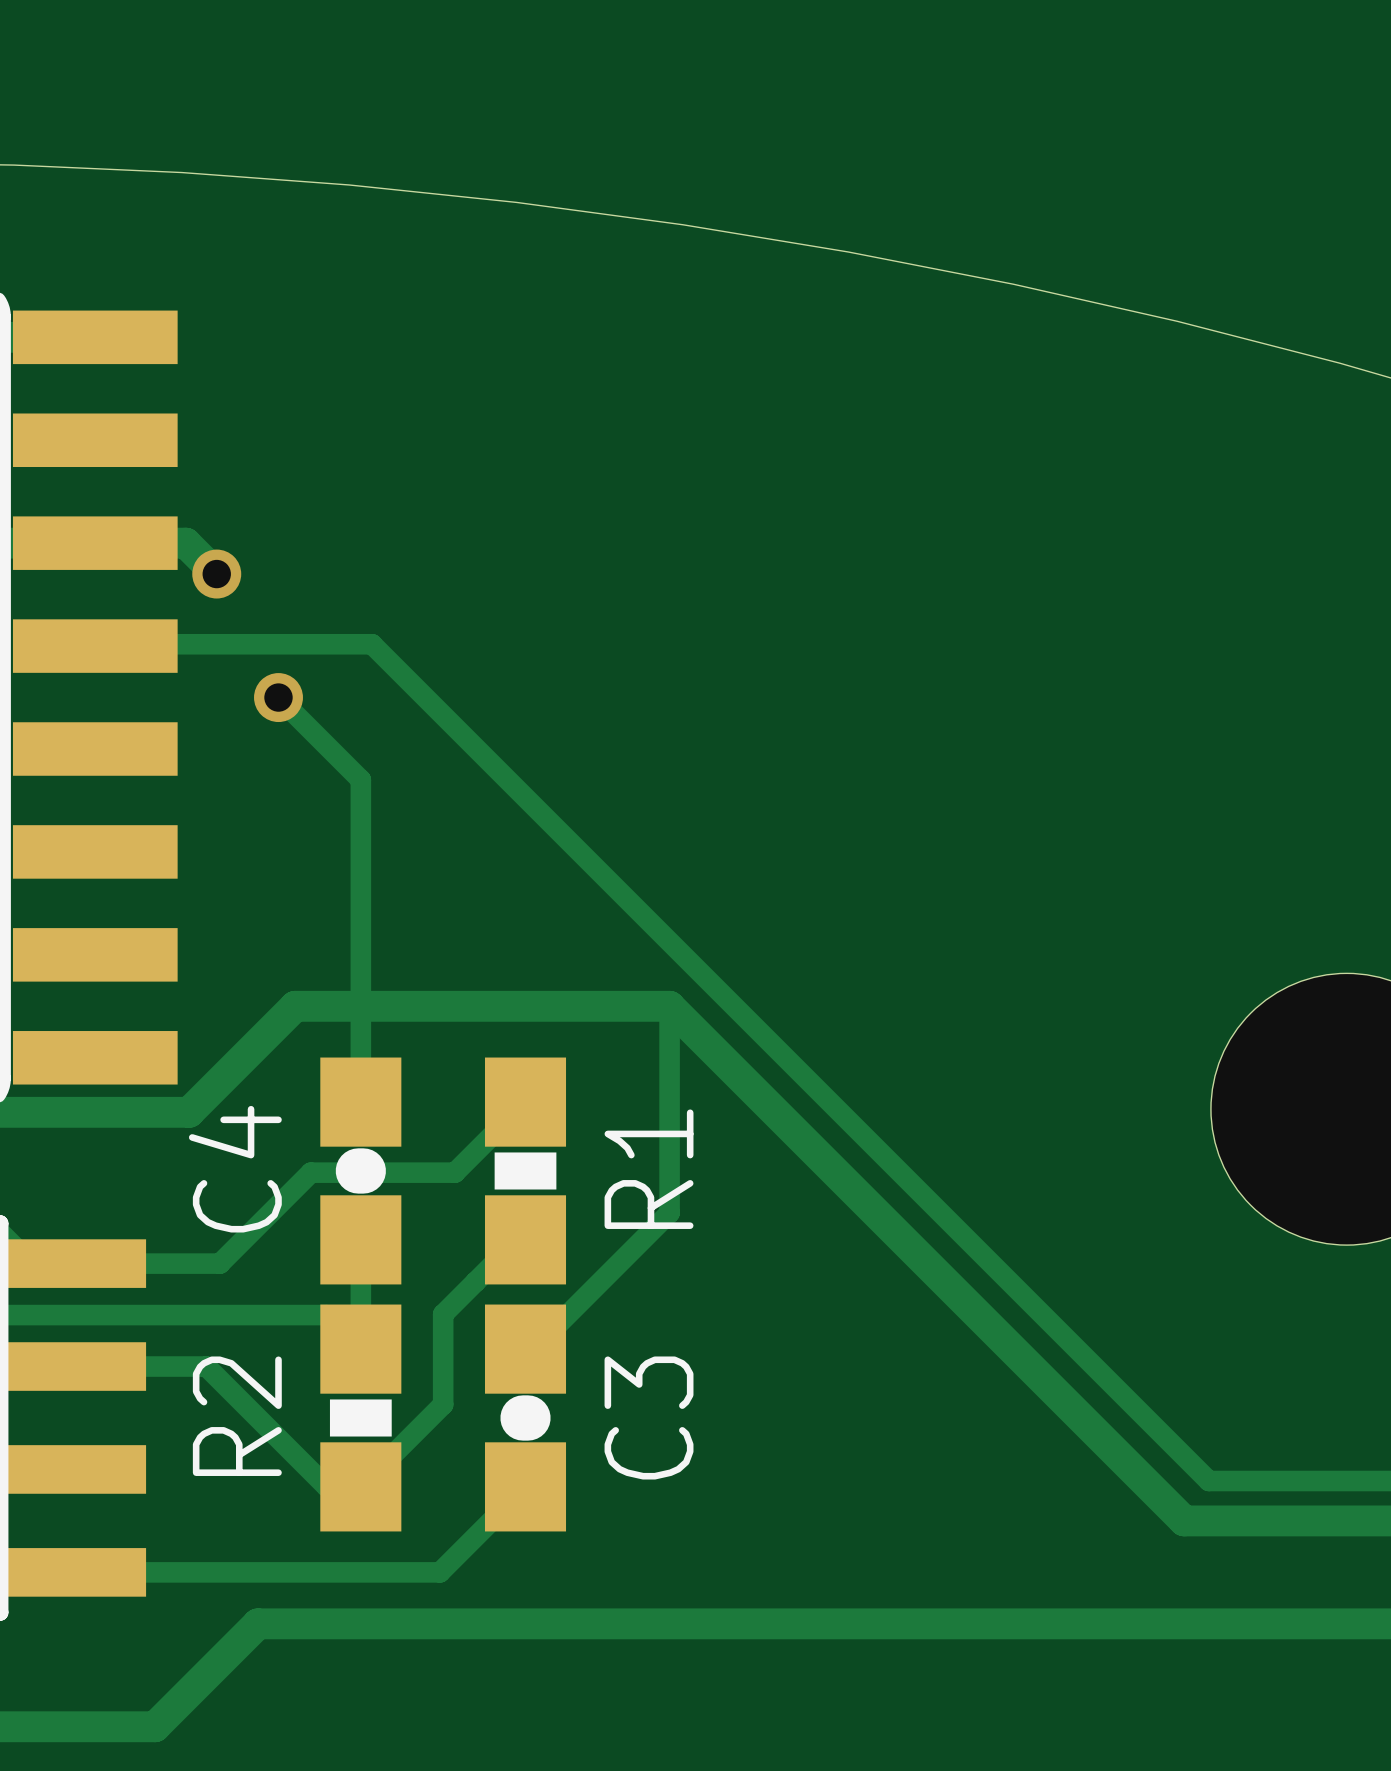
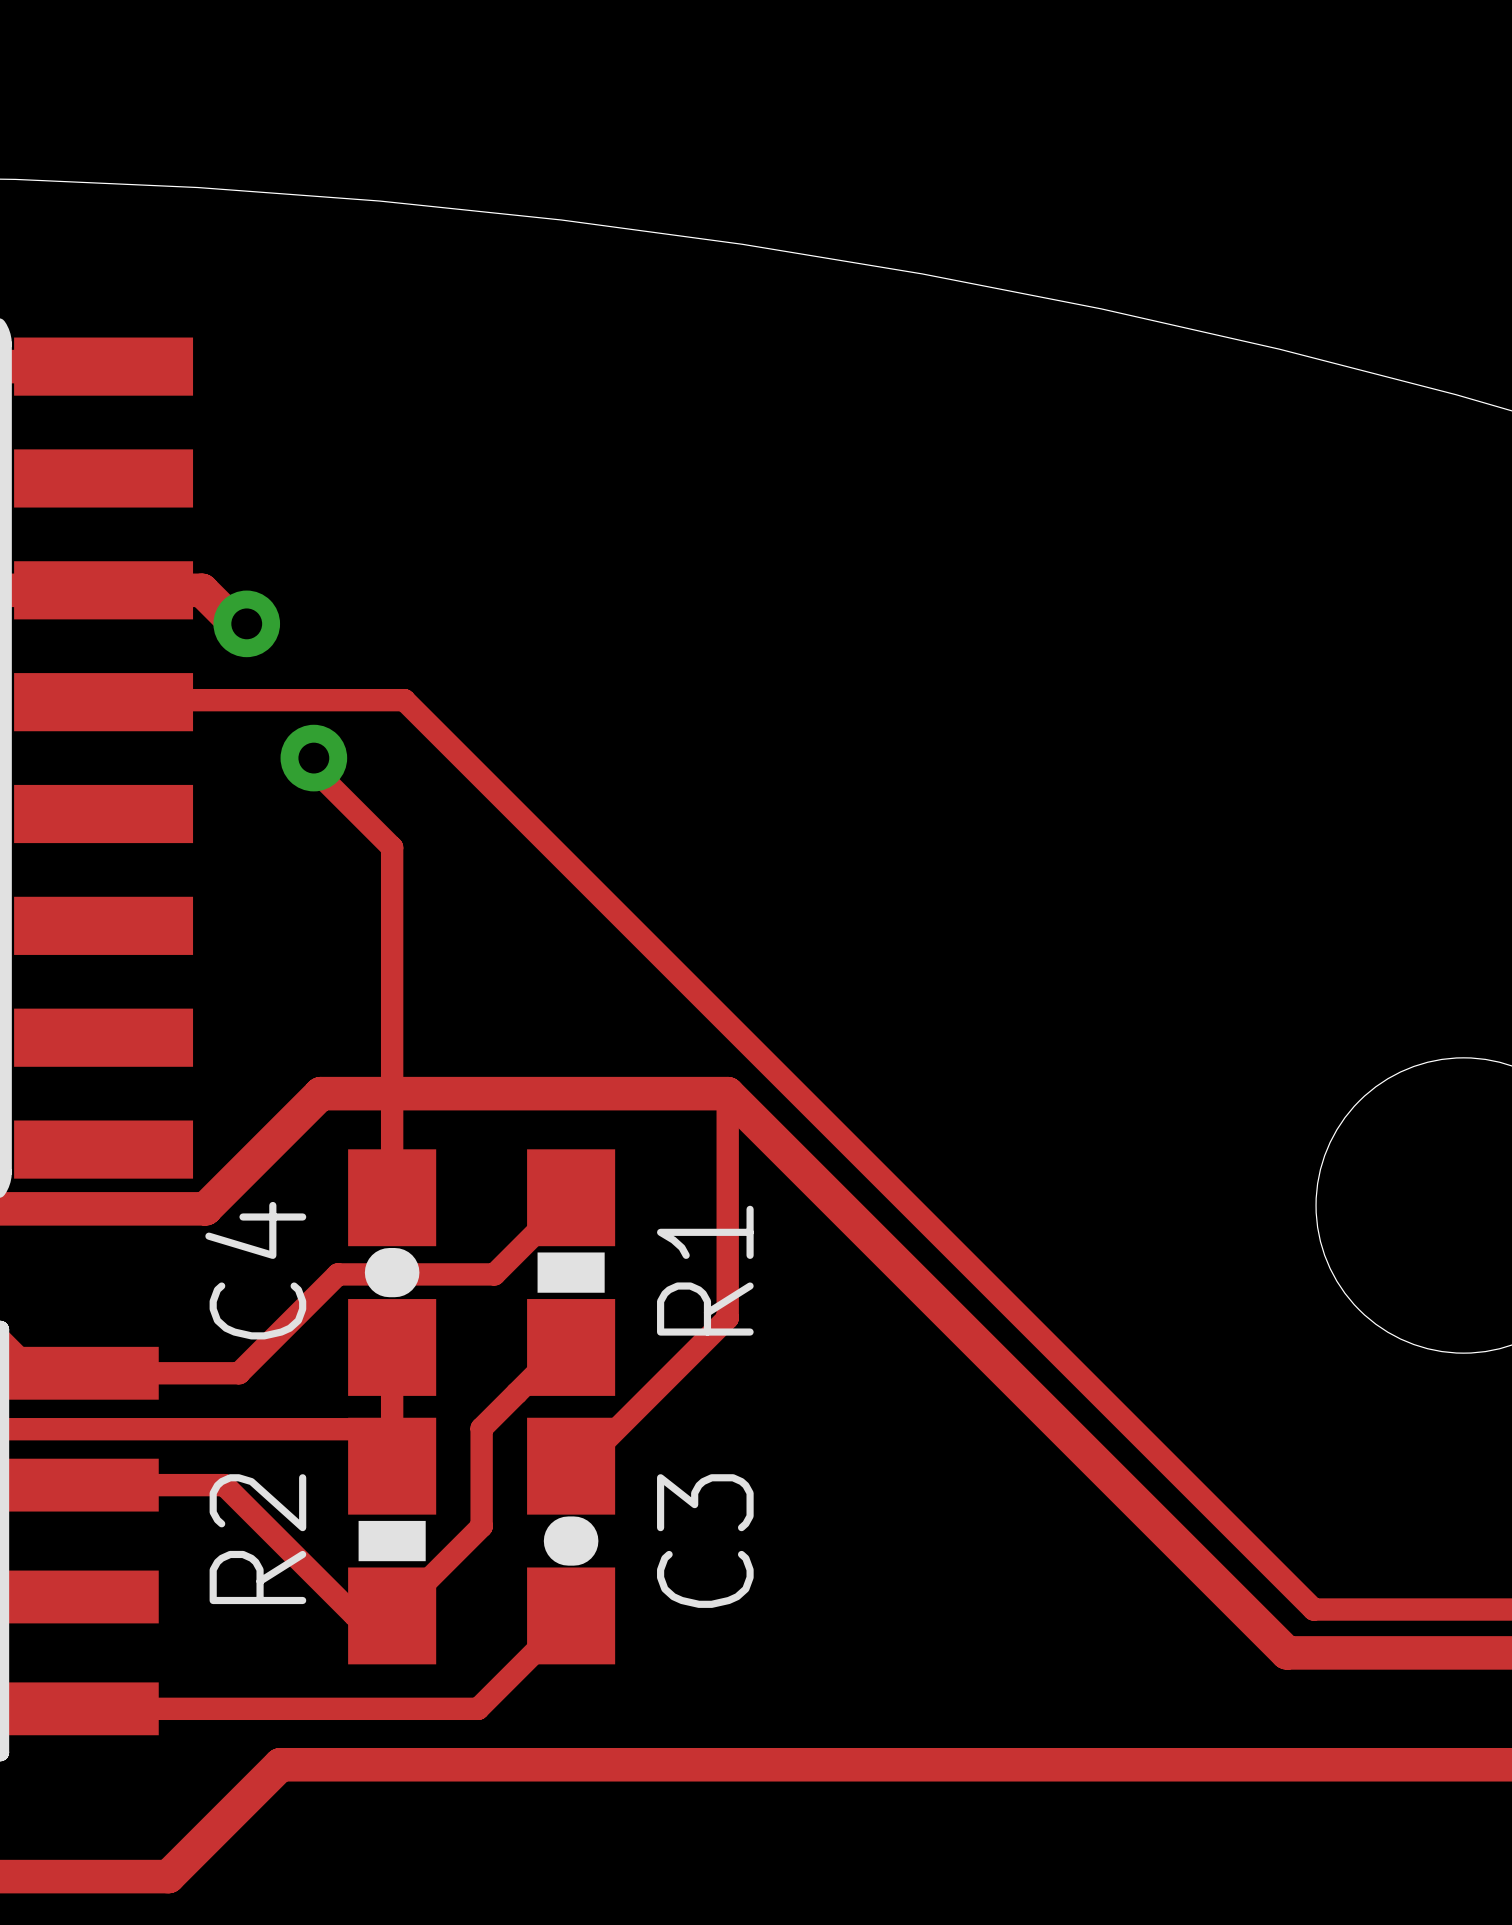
via size: [192, 549, 242, 599] -> [213, 590, 281, 658]
via size: [254, 673, 303, 723] -> [280, 724, 348, 792]

